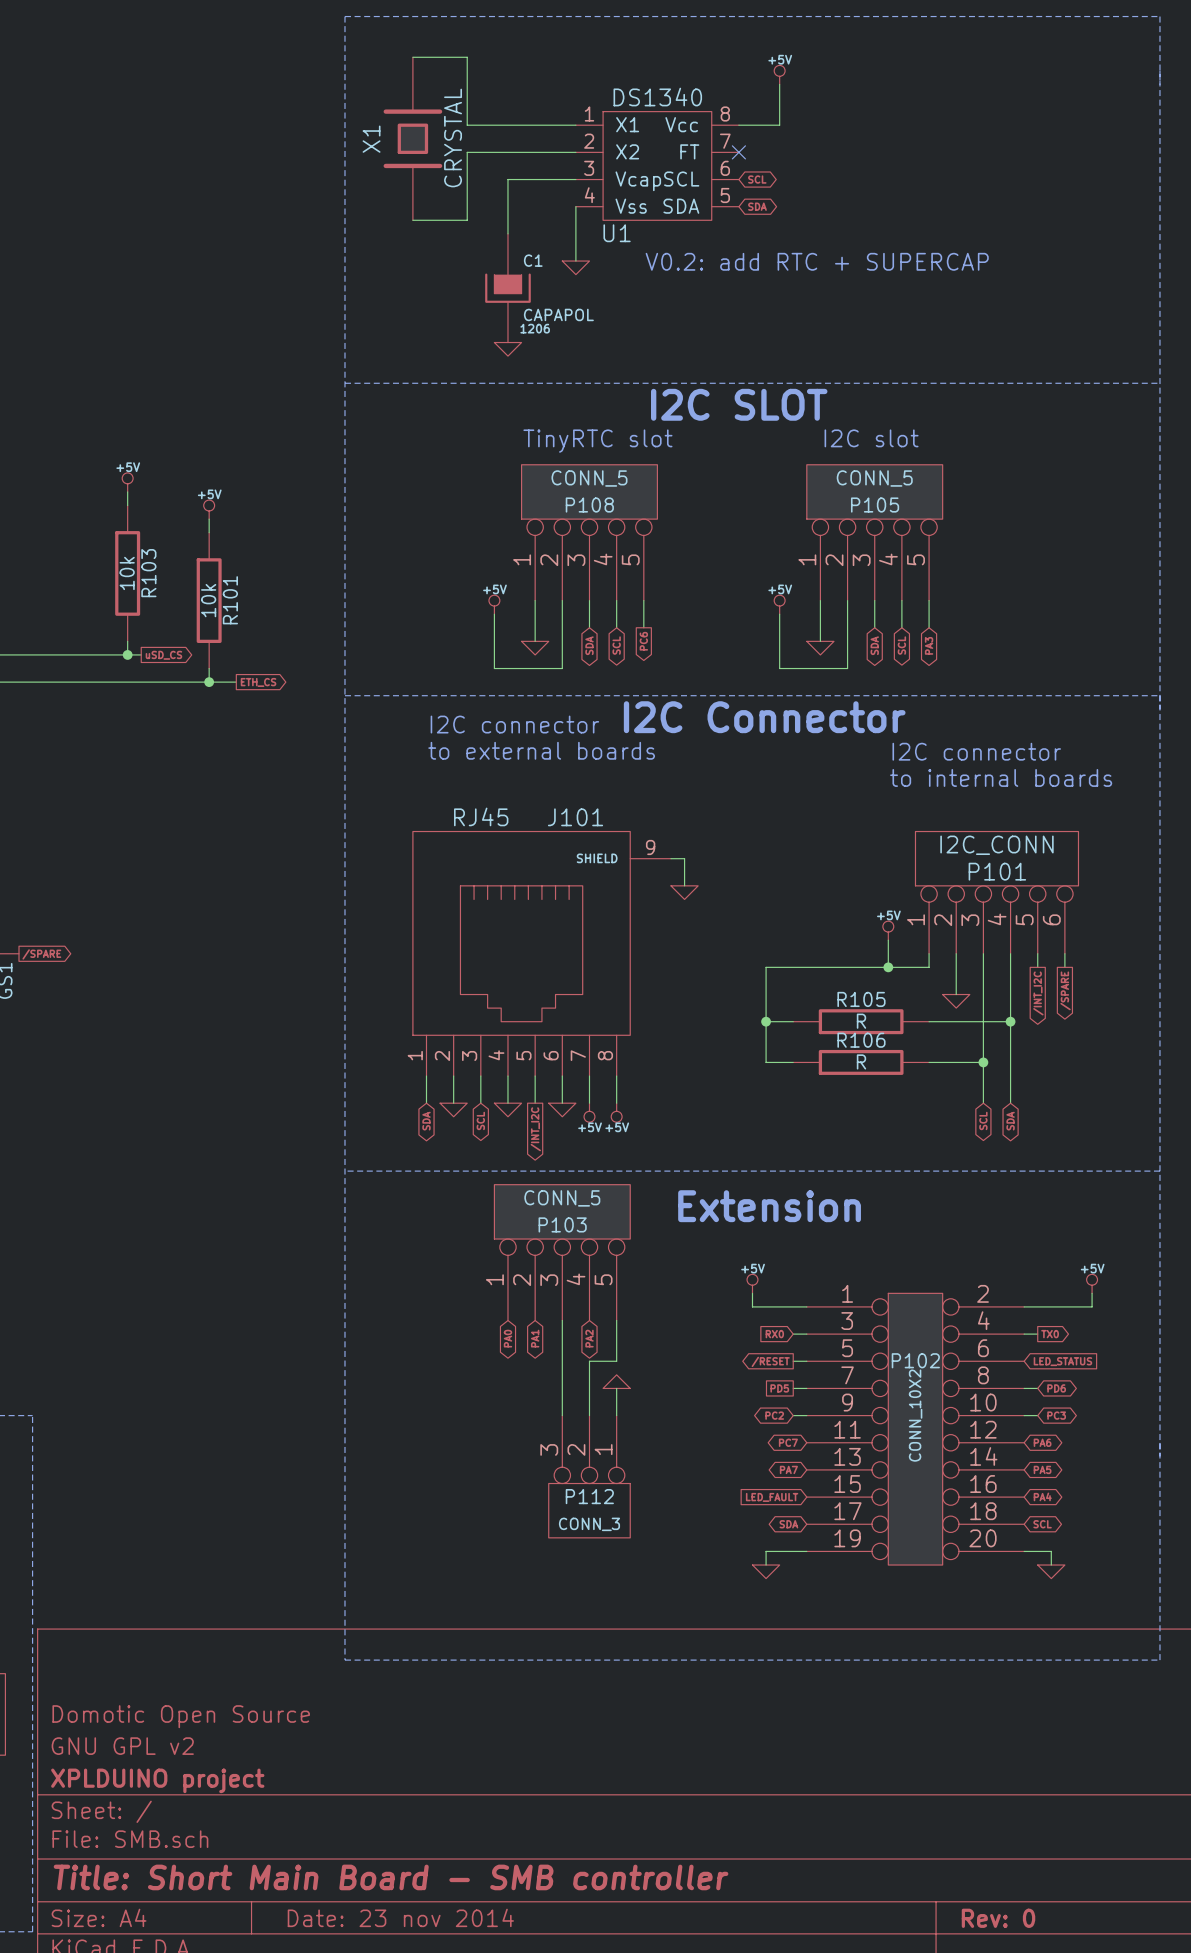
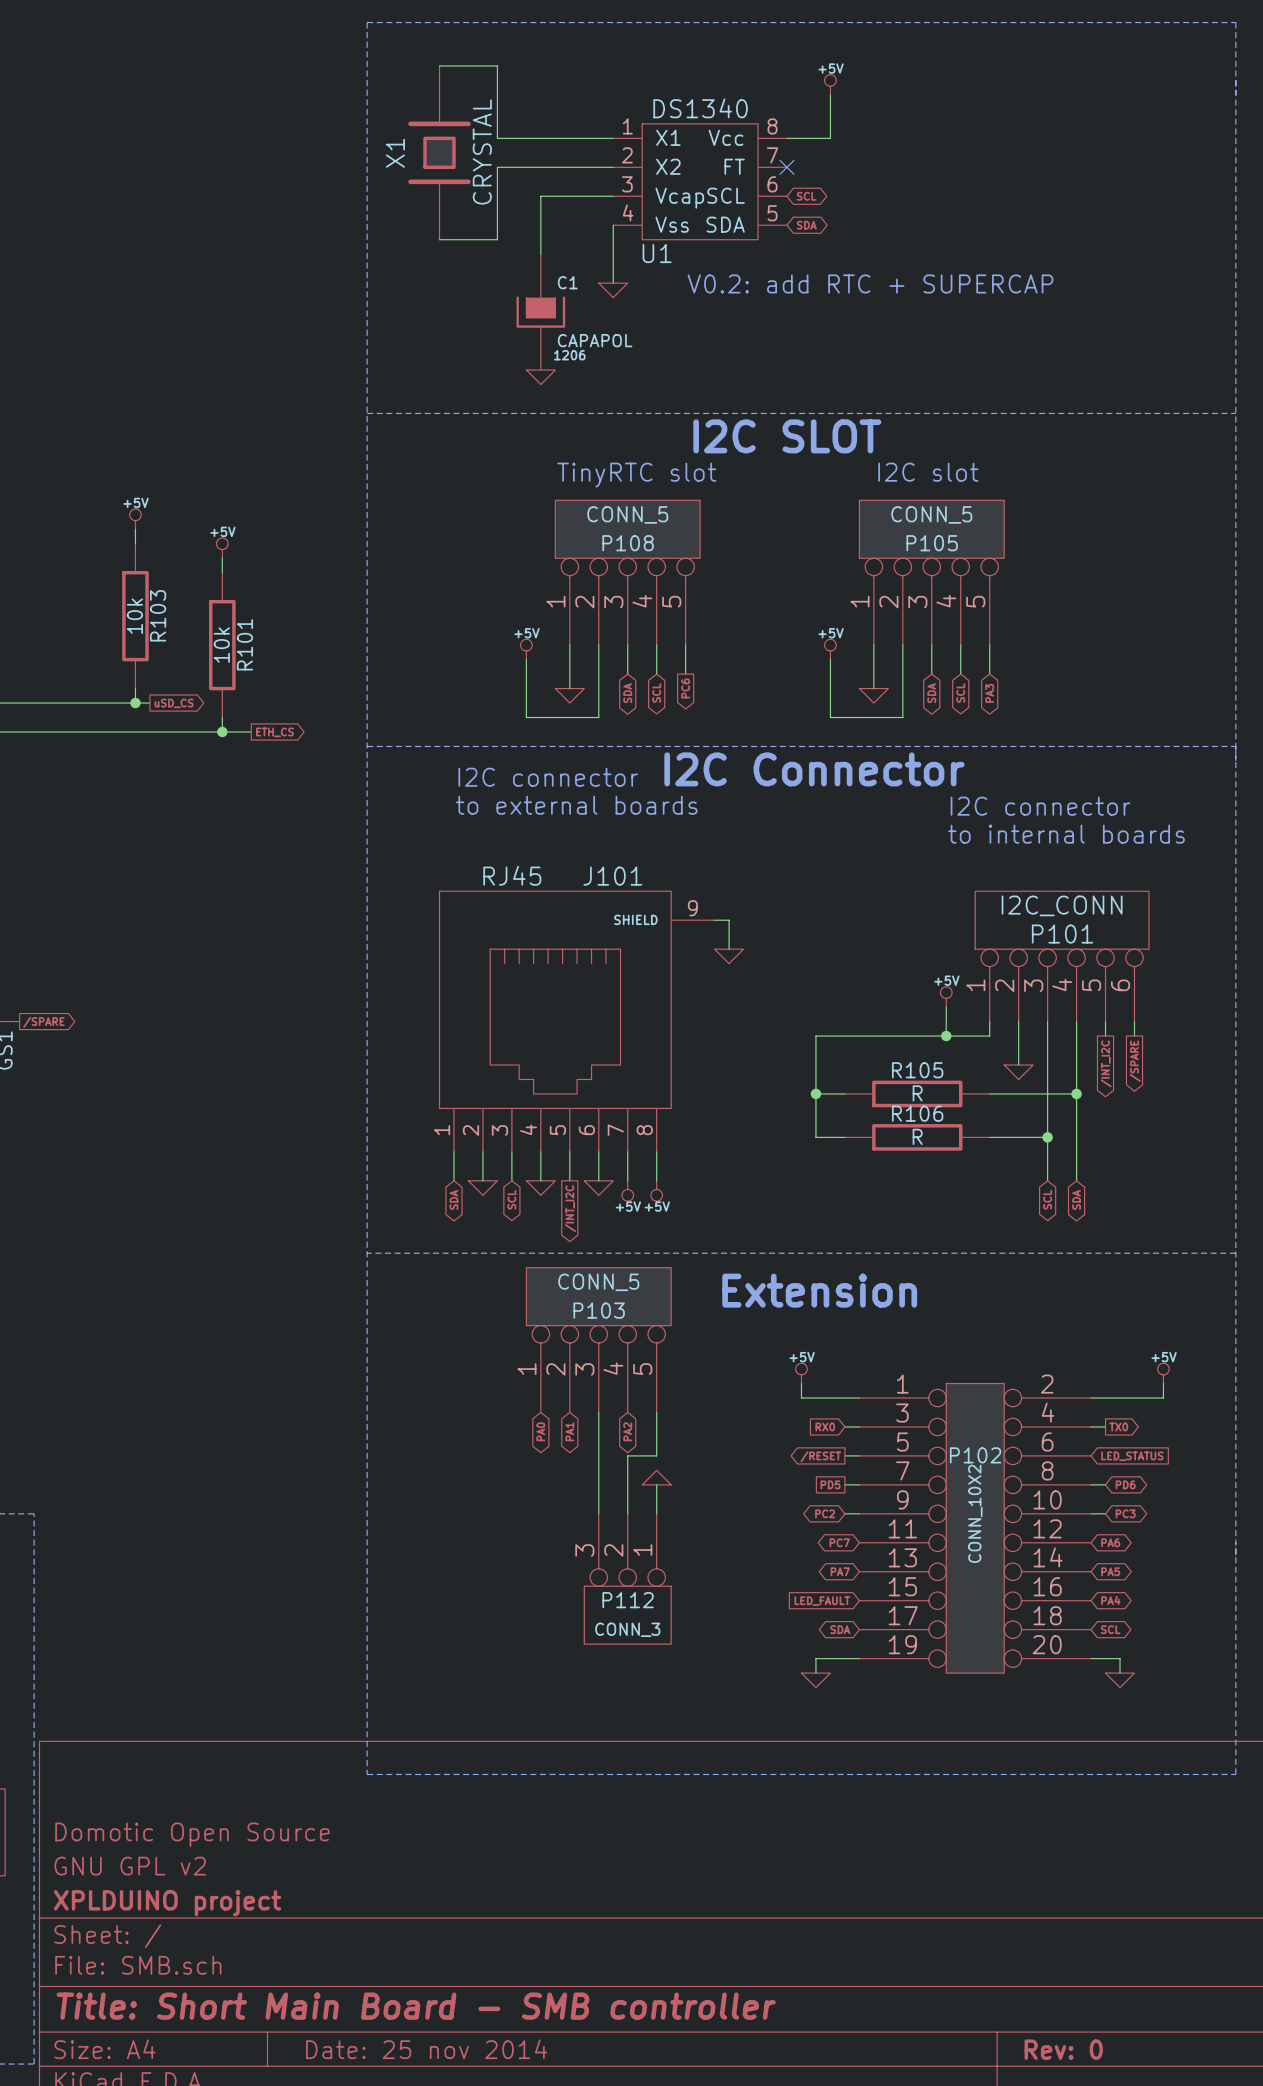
title block: Date: 23 nov 2014 (400, 1917) -> Date: 25 nov 2014 (426, 2049)

